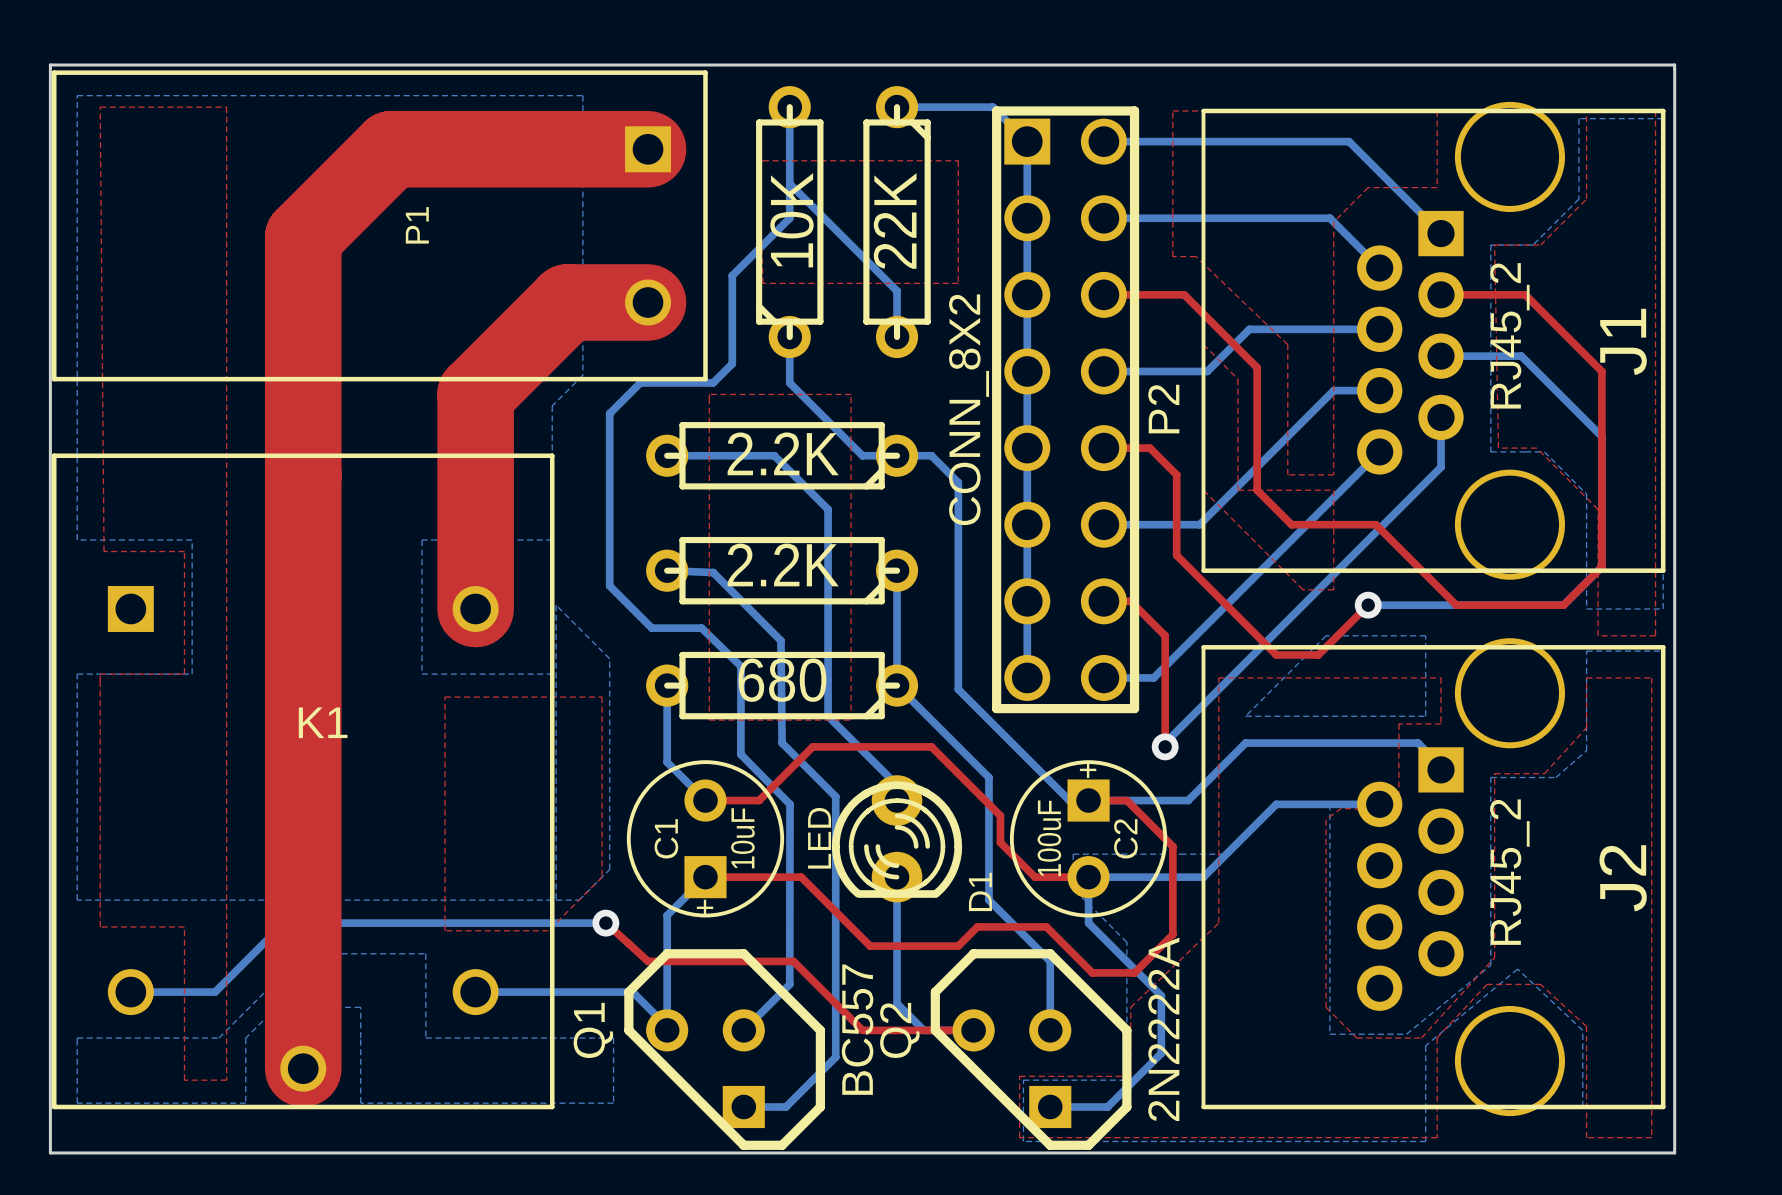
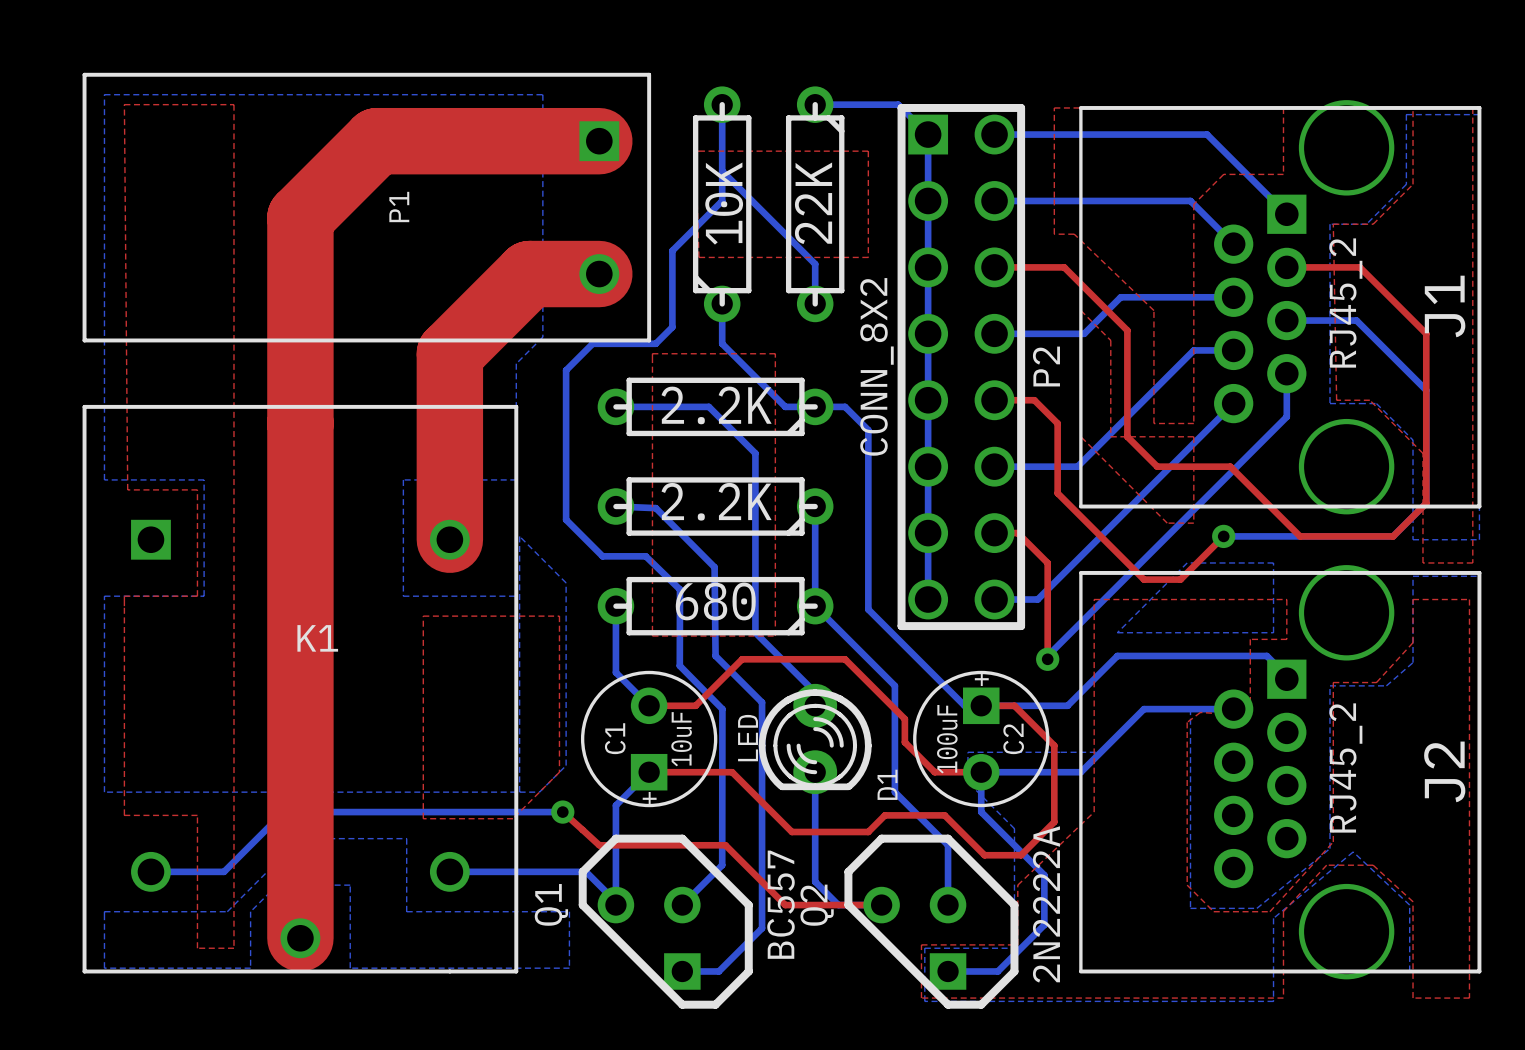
board edge: (50, 65) (50, 1152) (1674, 1152) (1674, 65) (50, 65) -> none

